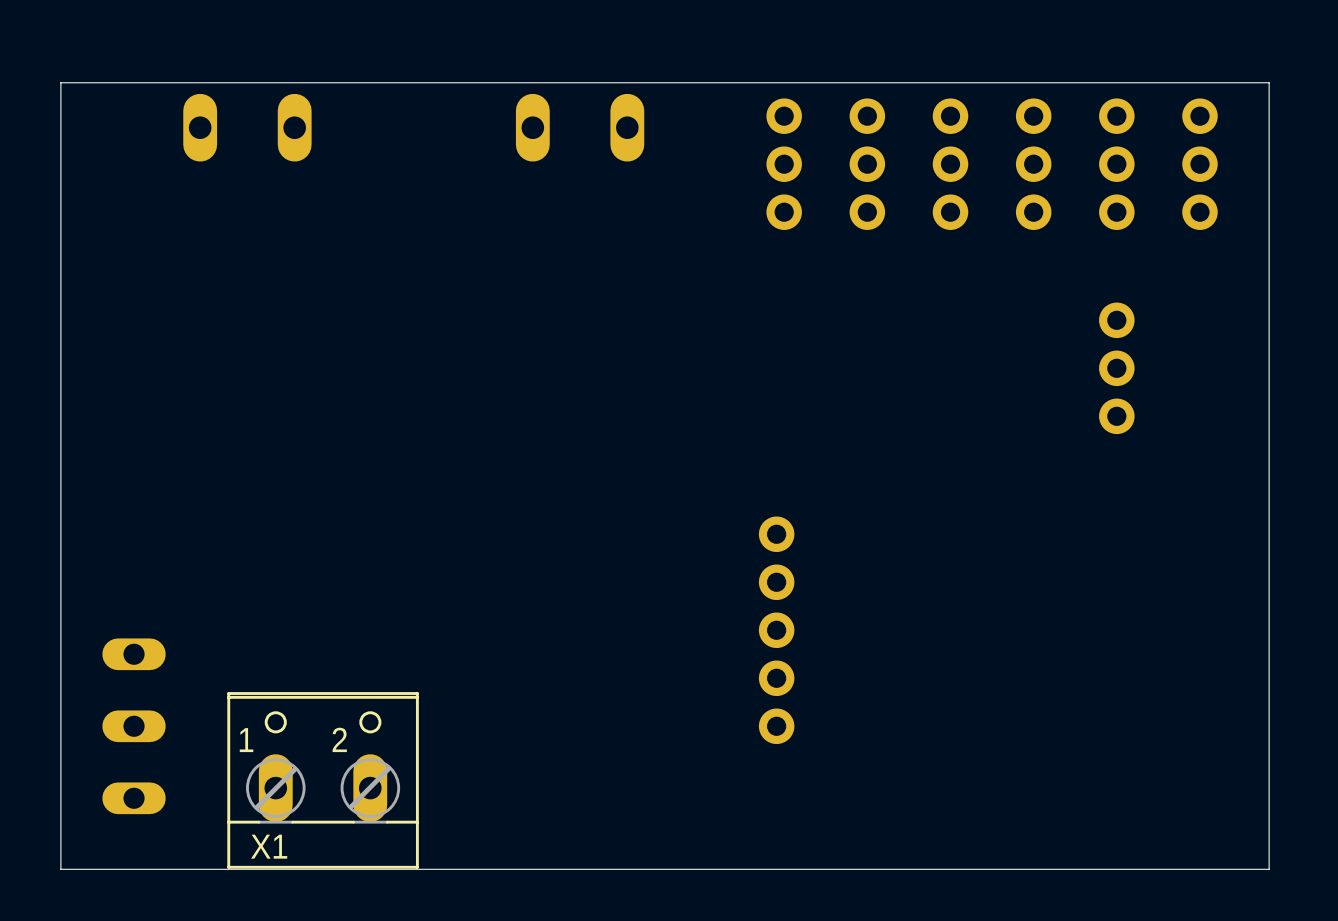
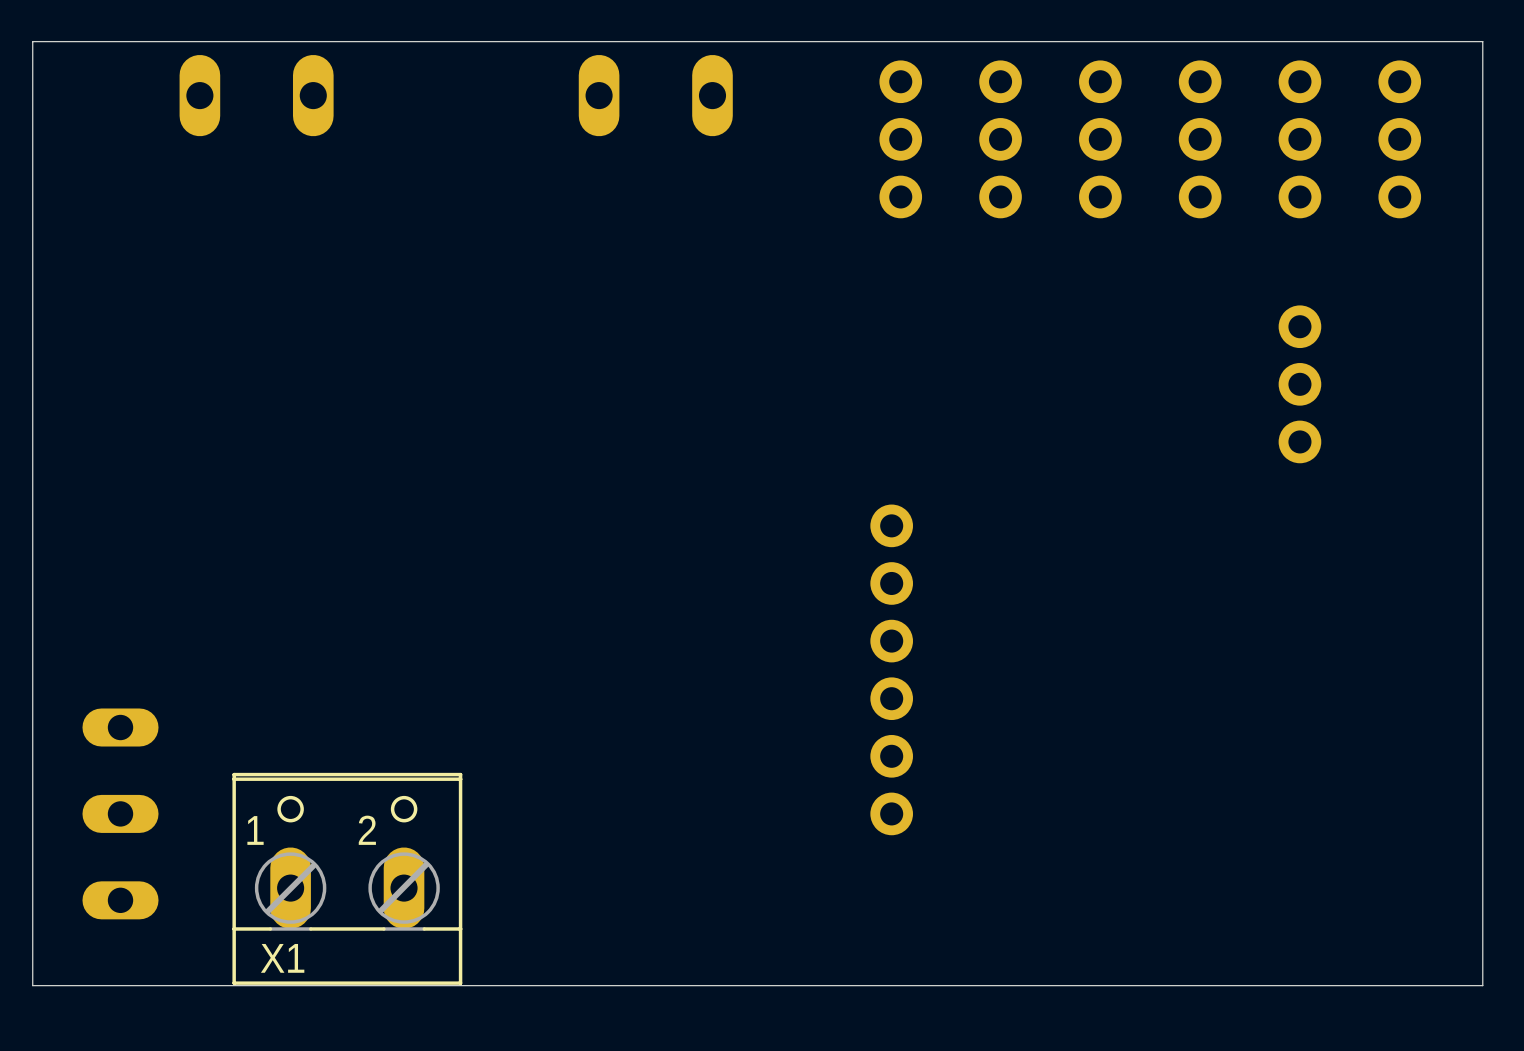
part: none -> (891, 669)

